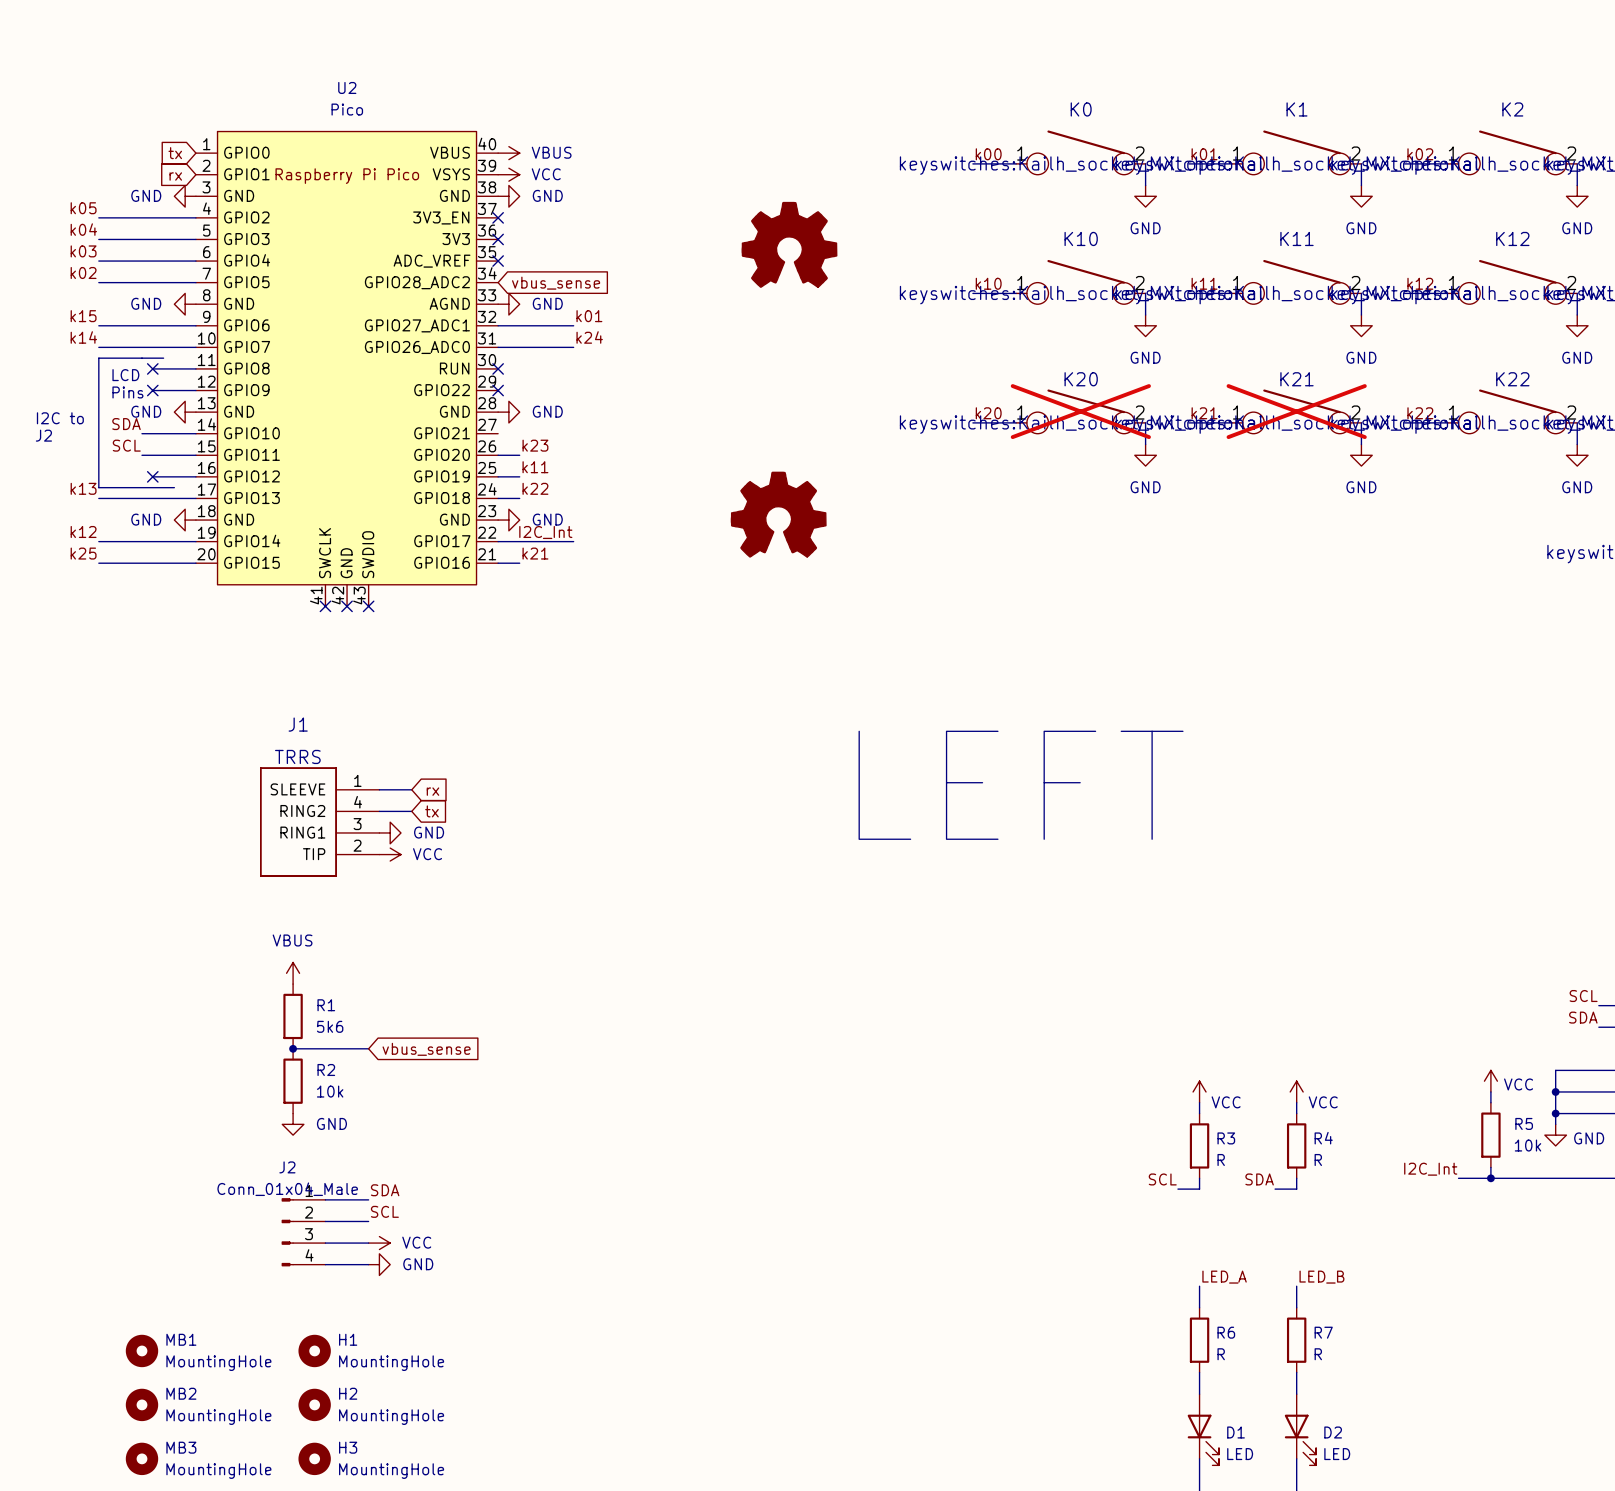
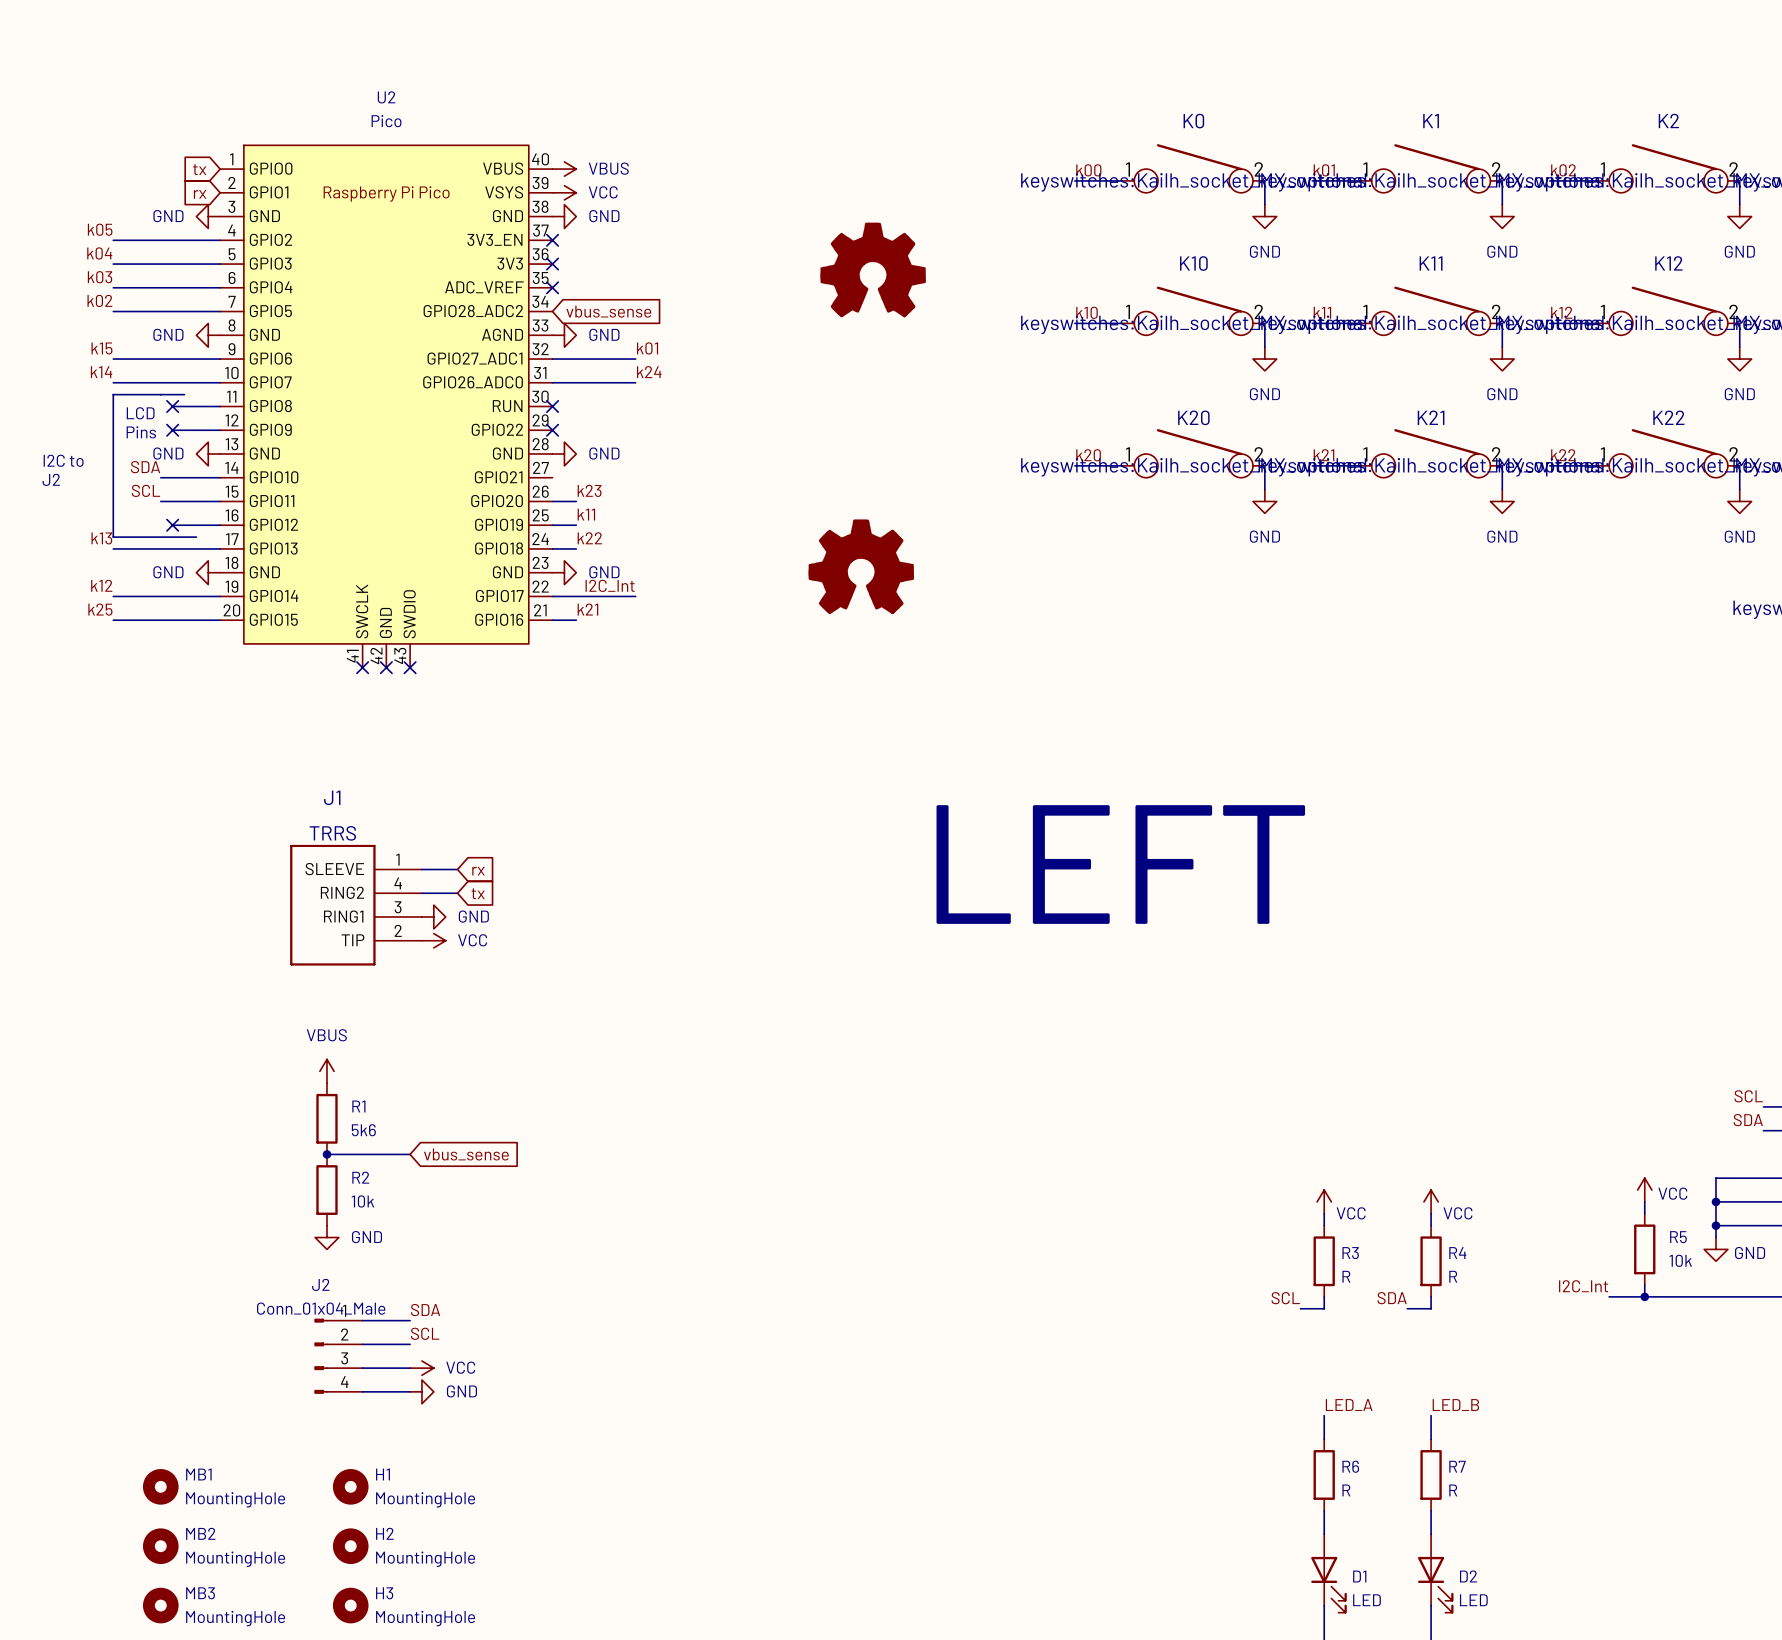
K20 do-not-place cross: (1080, 411) -> none
K21 do-not-place cross: (1296, 411) -> none

